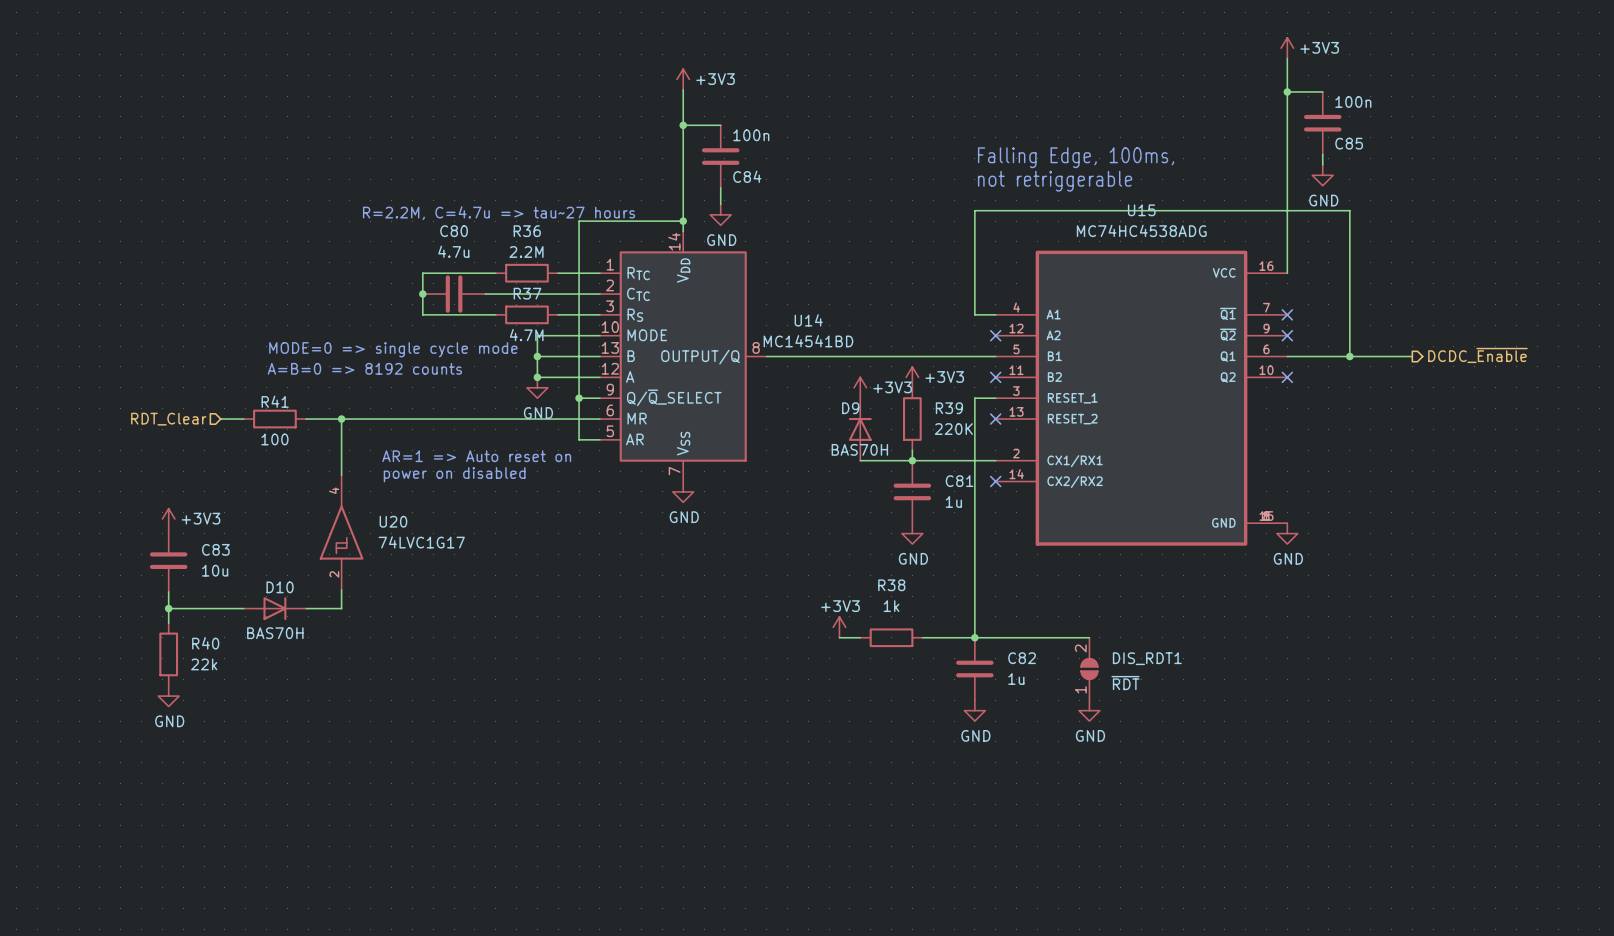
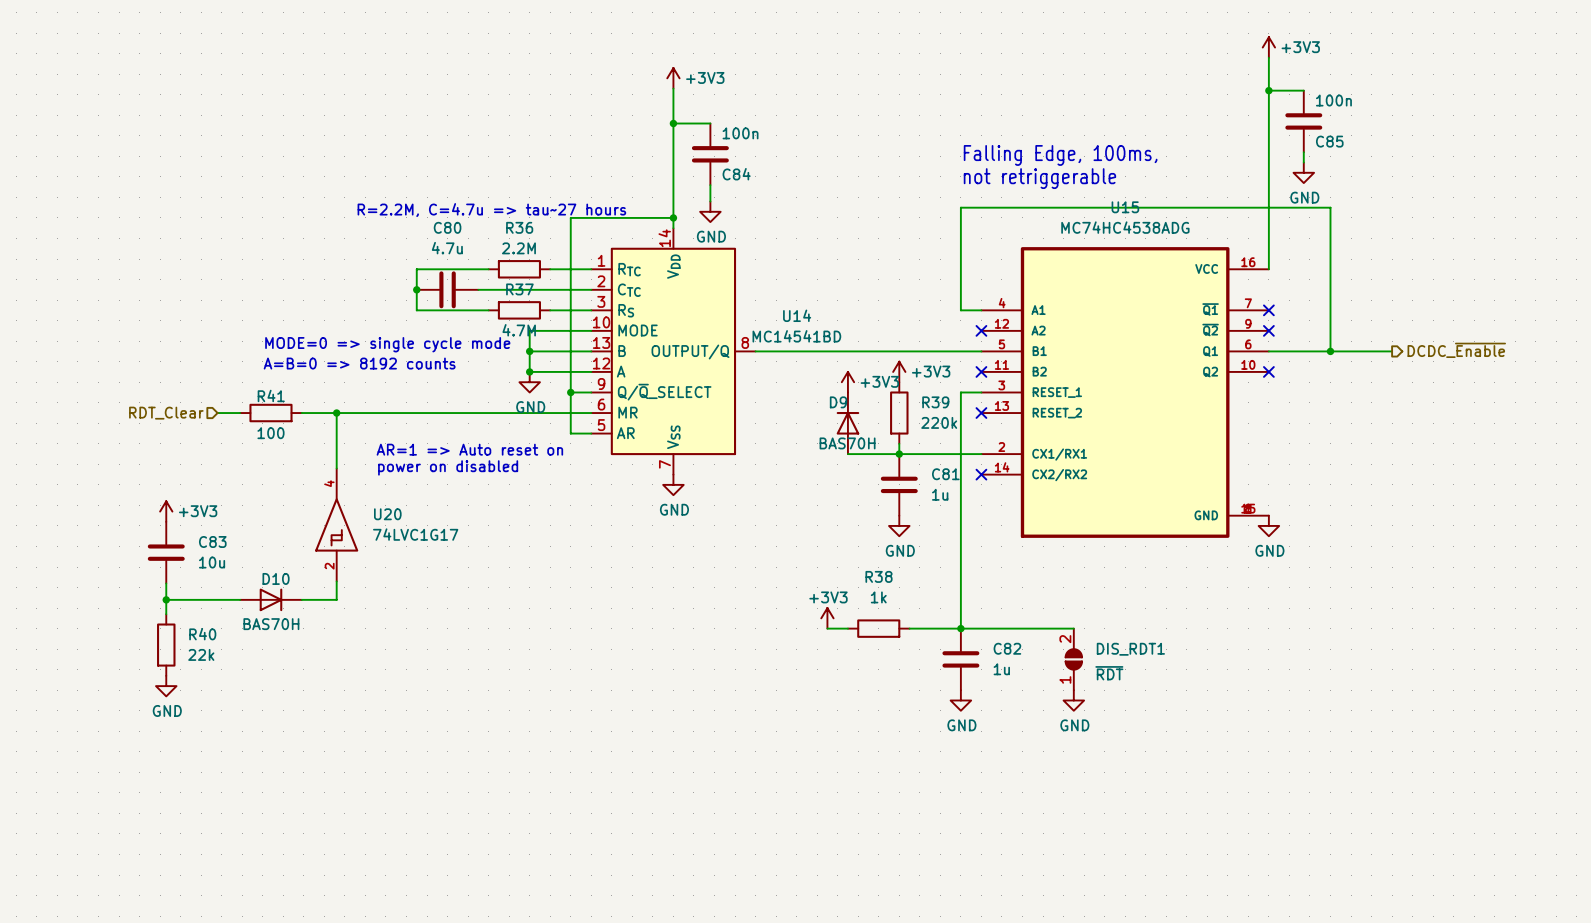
R39 value: 220K (953, 429) -> 220k (939, 422)

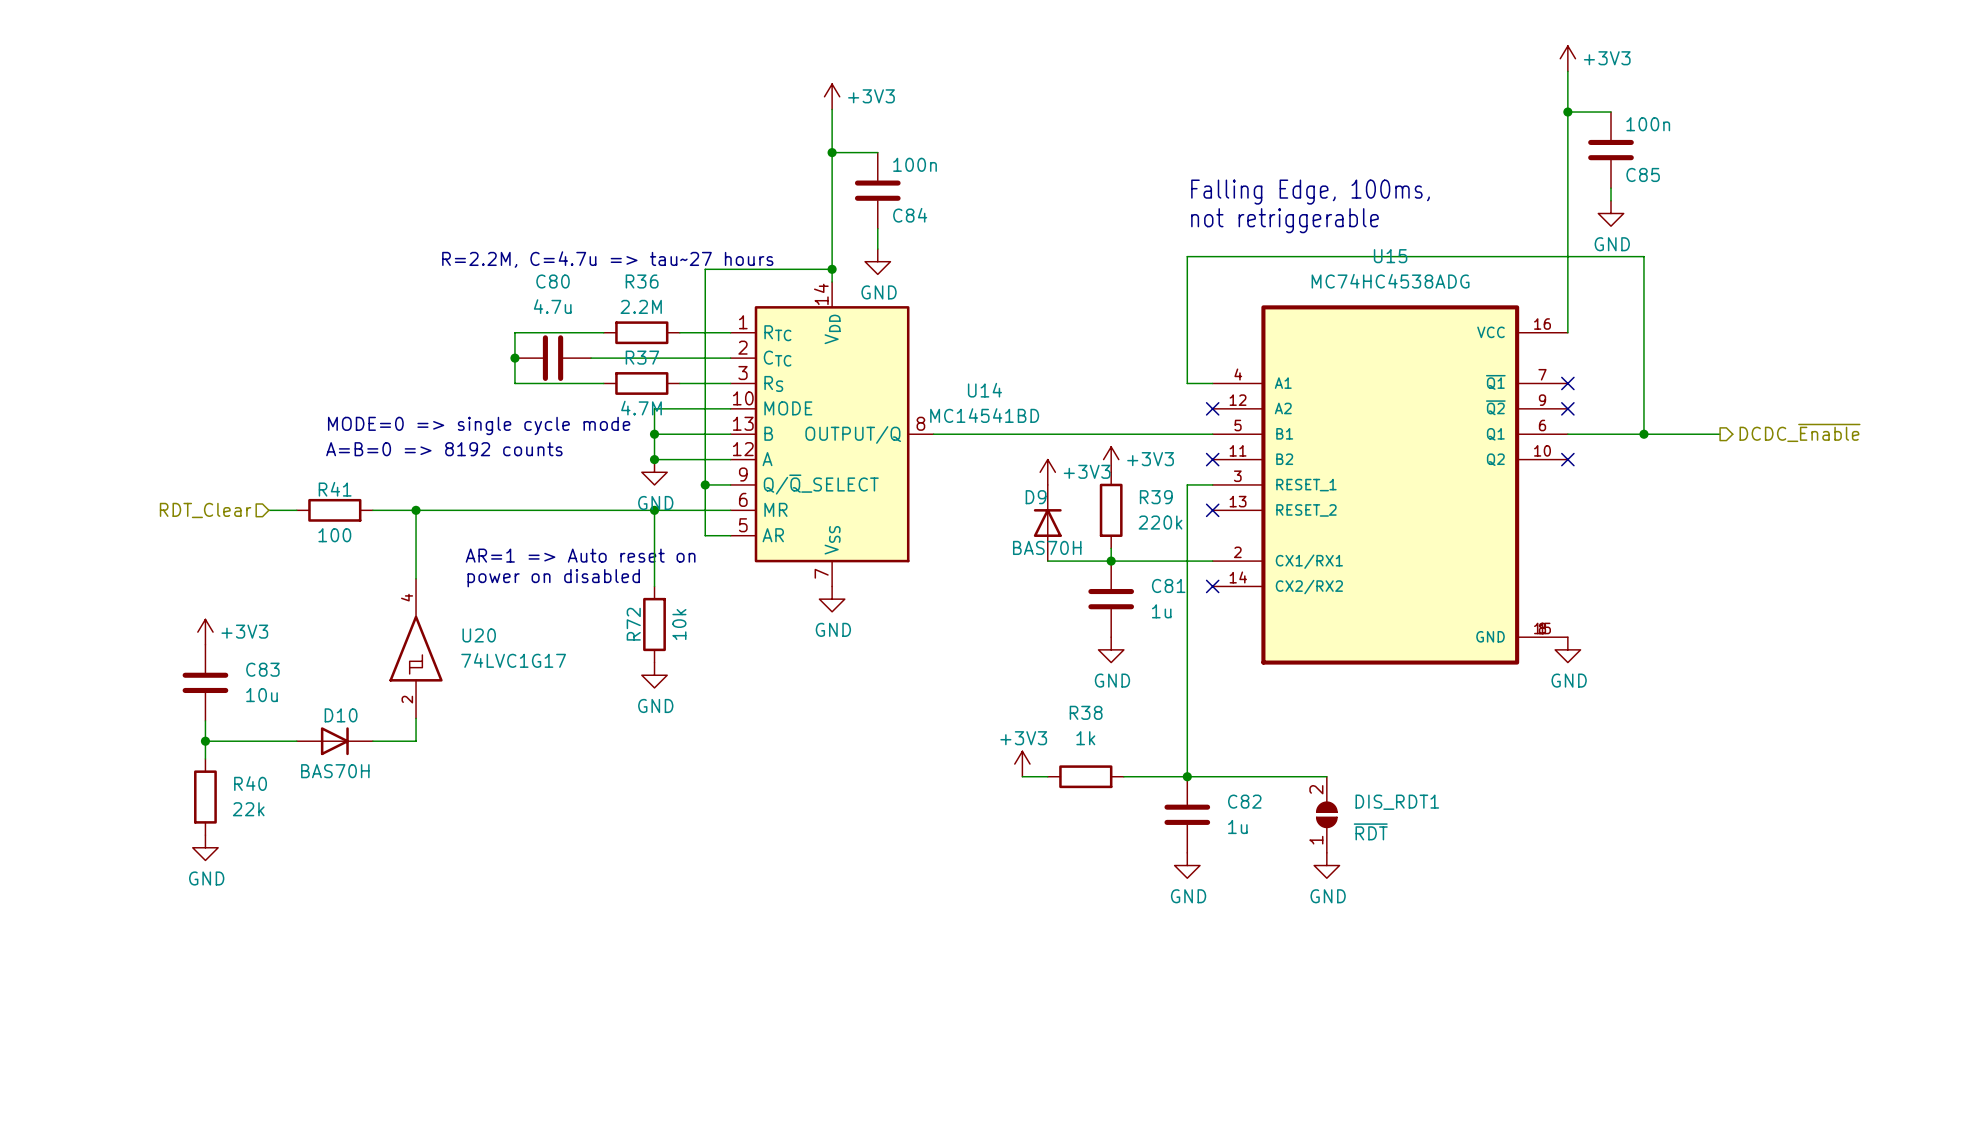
wire: none -> (654, 510) (654, 586)
junction: none -> (654, 510)
R72: none -> 10k (654, 624)
power symbol: none -> GND (654, 675)

